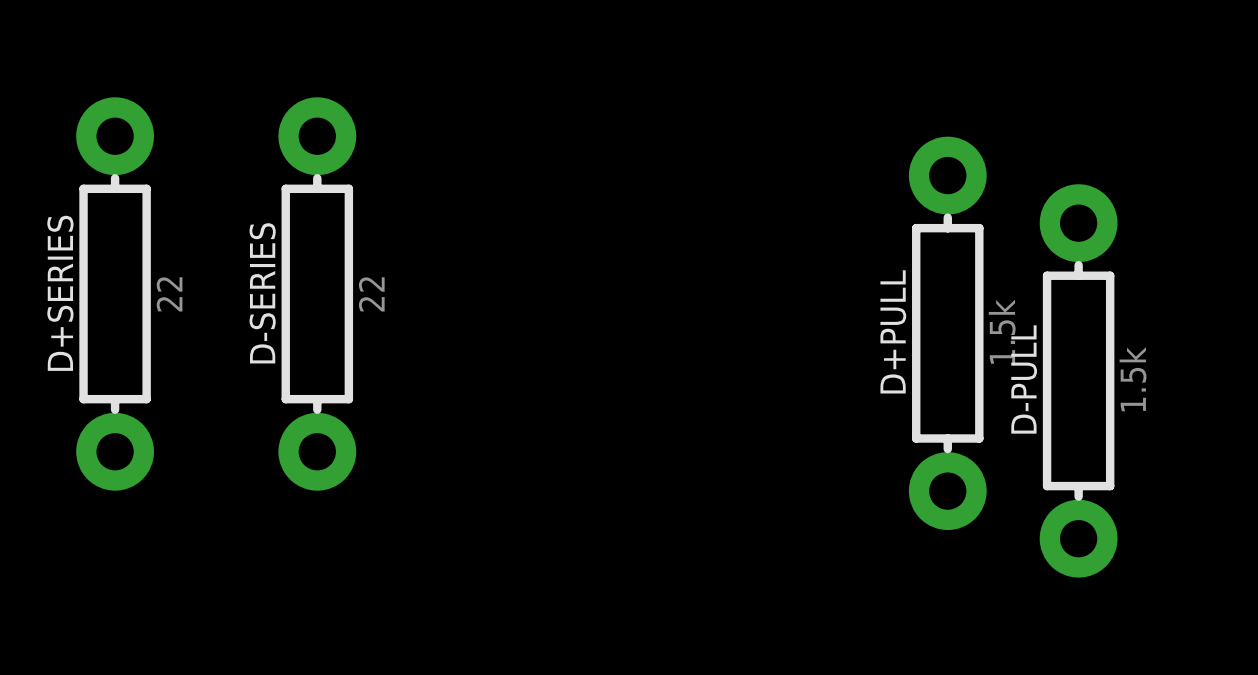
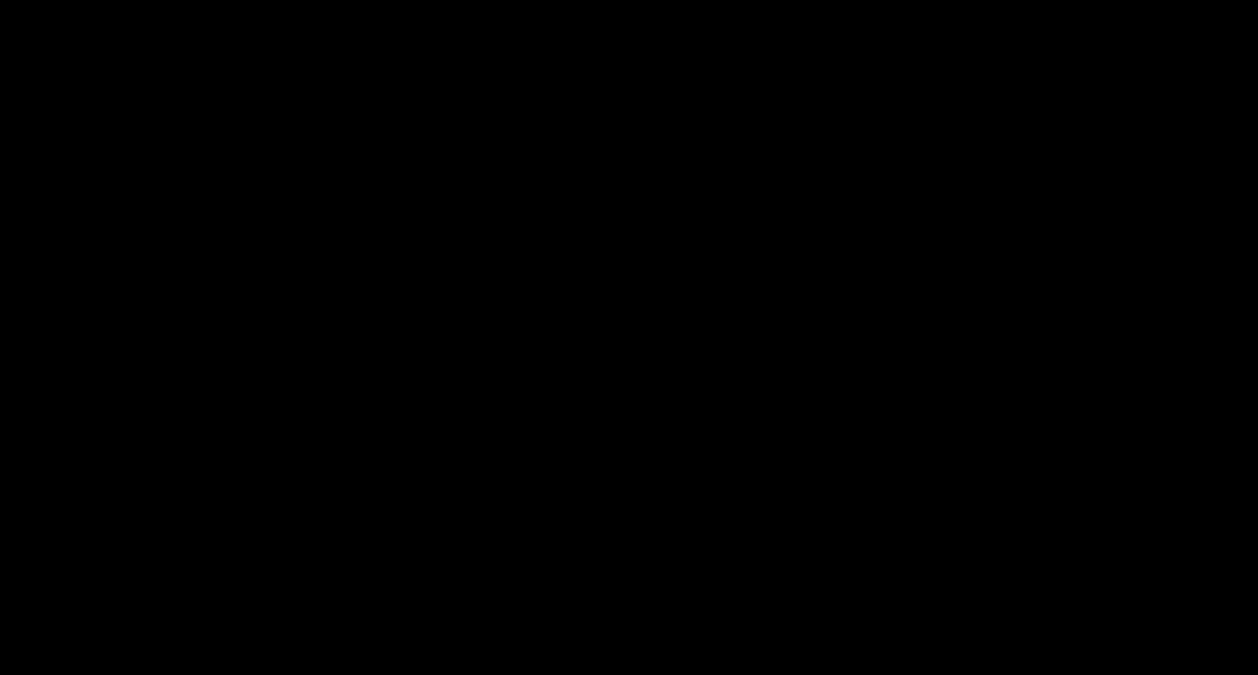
D+SERIES: 22 (115, 293) -> none
D-SERIES: 22 (317, 293) -> none
D+PULL: 1.5k (947, 333) -> none
D-PULL: 1.5k (1078, 380) -> none

